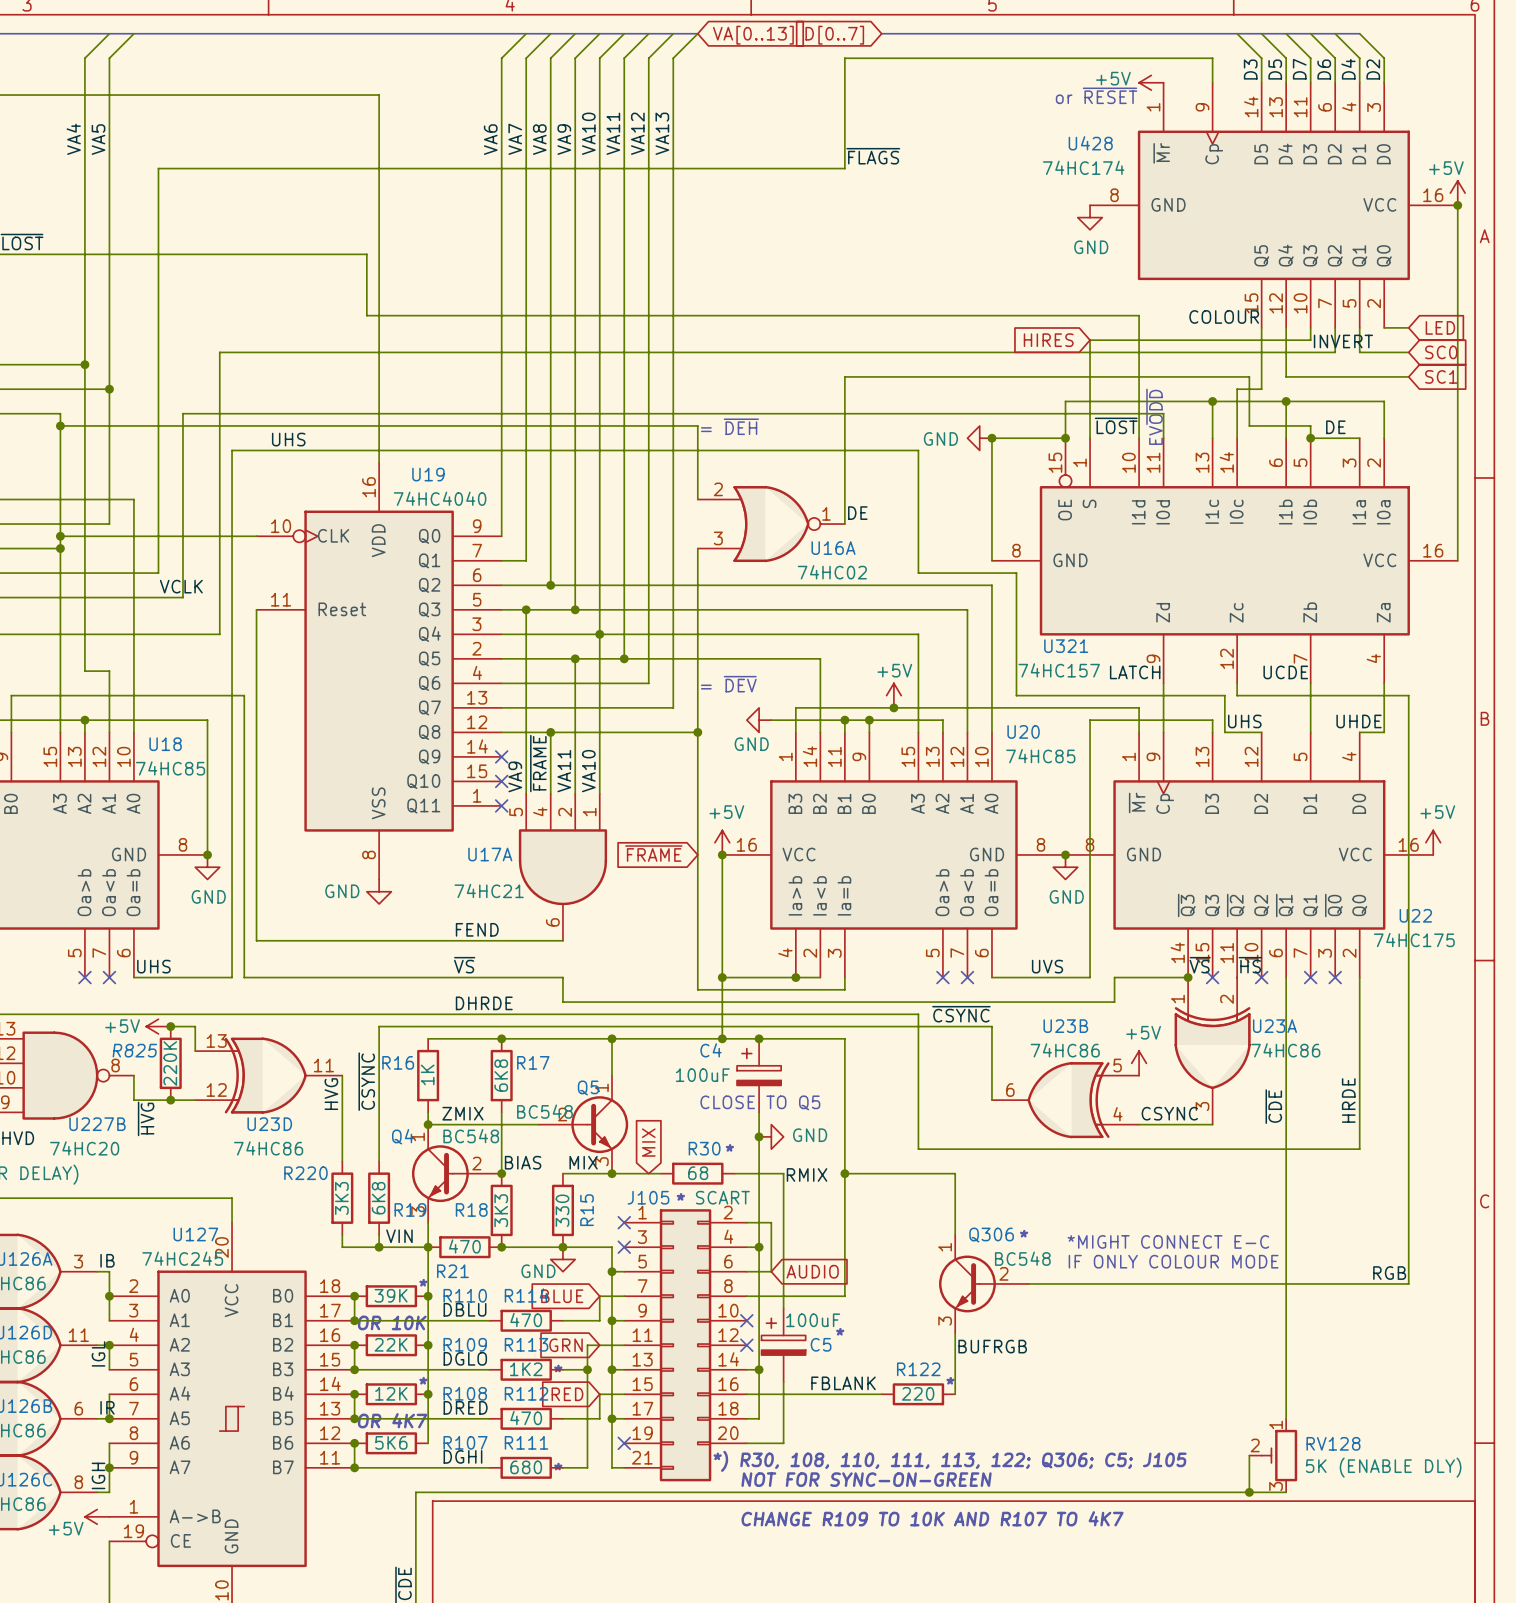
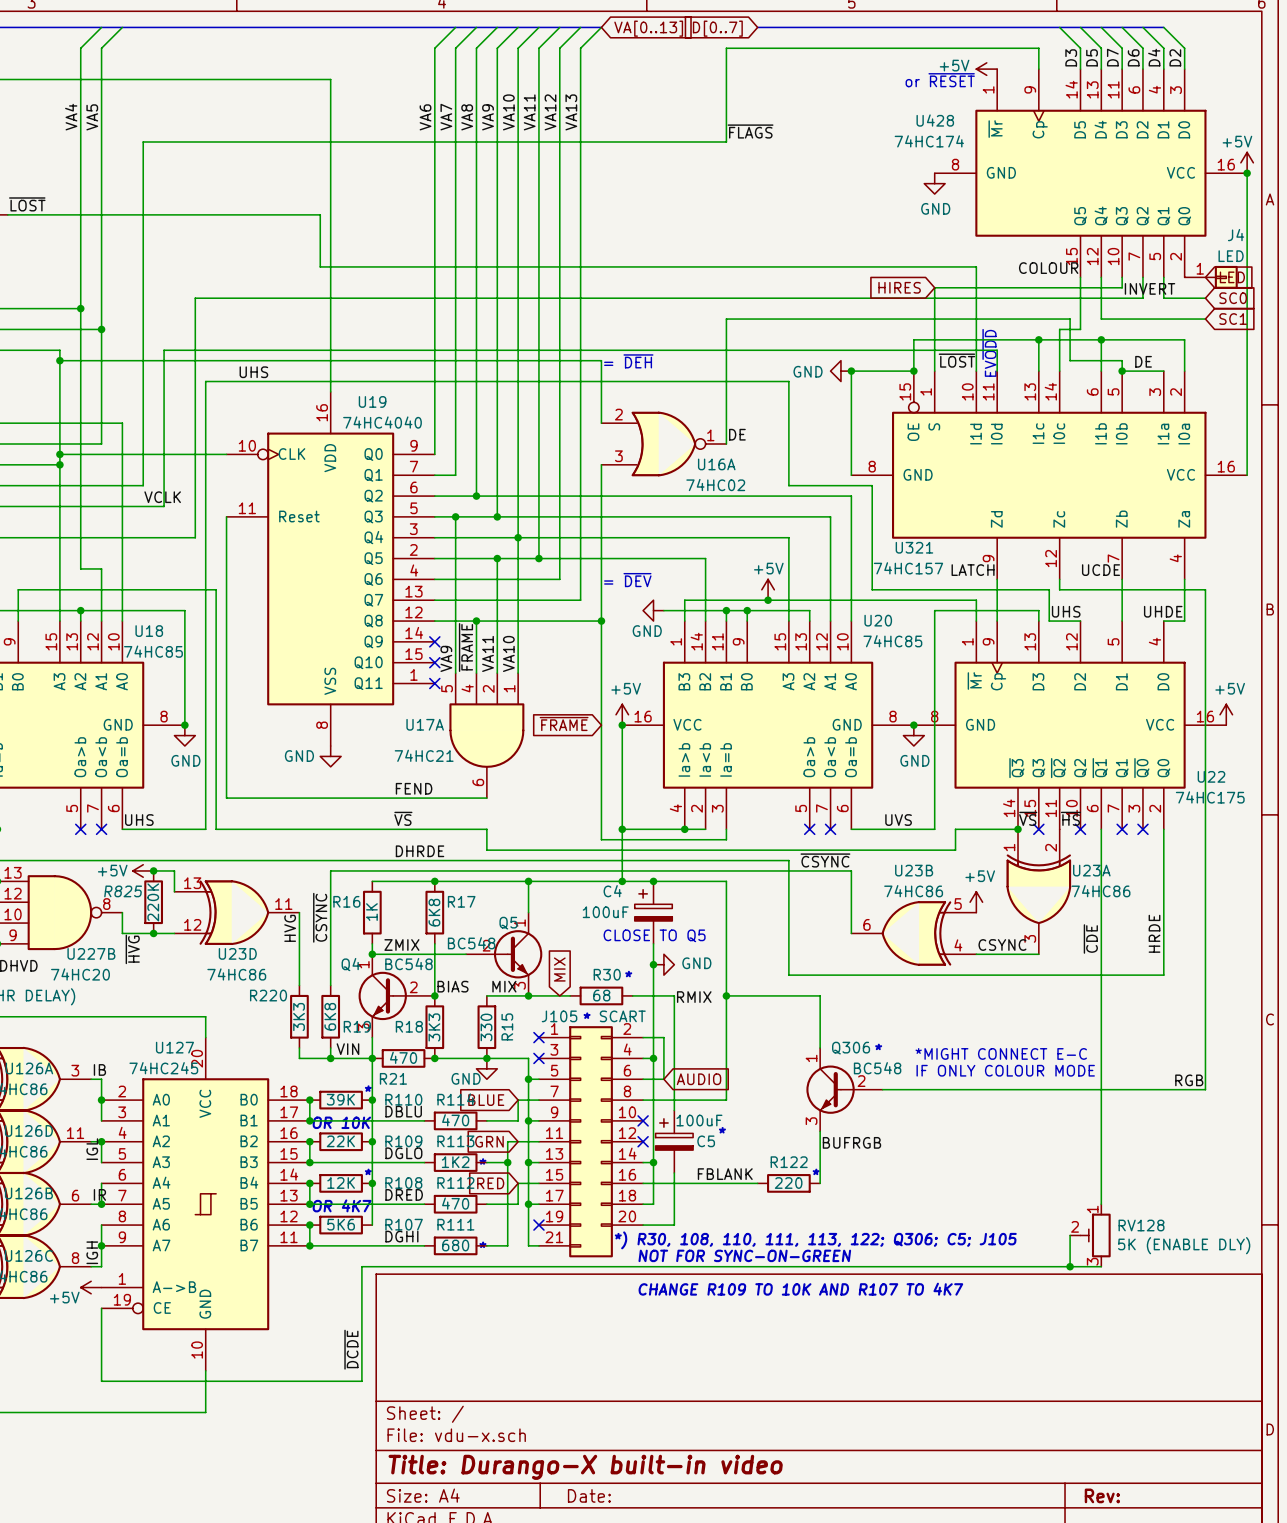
J4: none -> LED (1211, 277)

